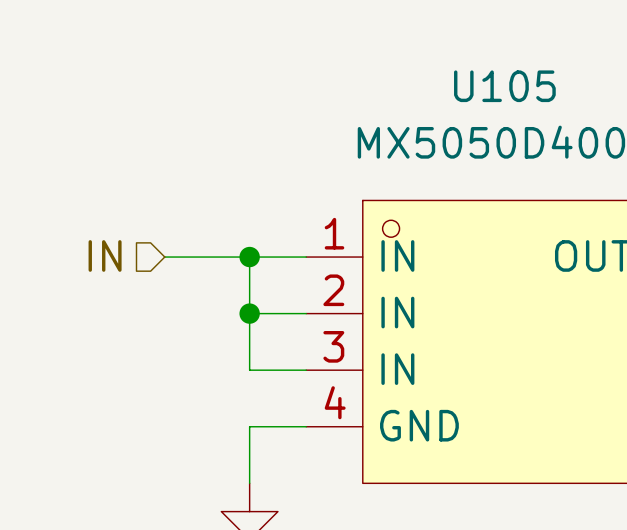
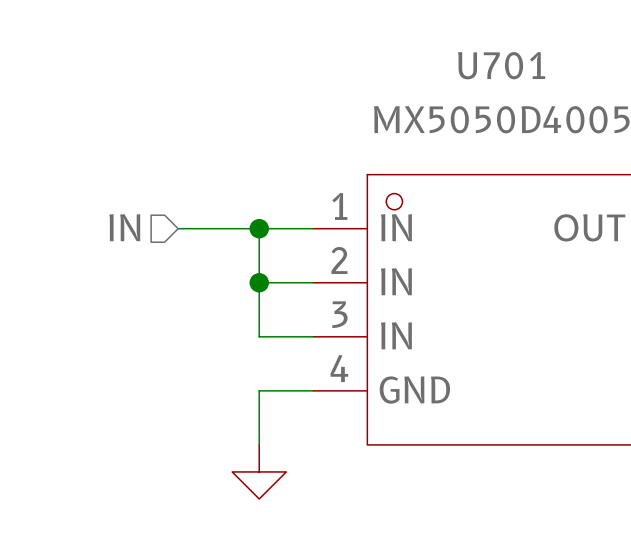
U105 name: U105 (504, 86) -> U701 (501, 65)

